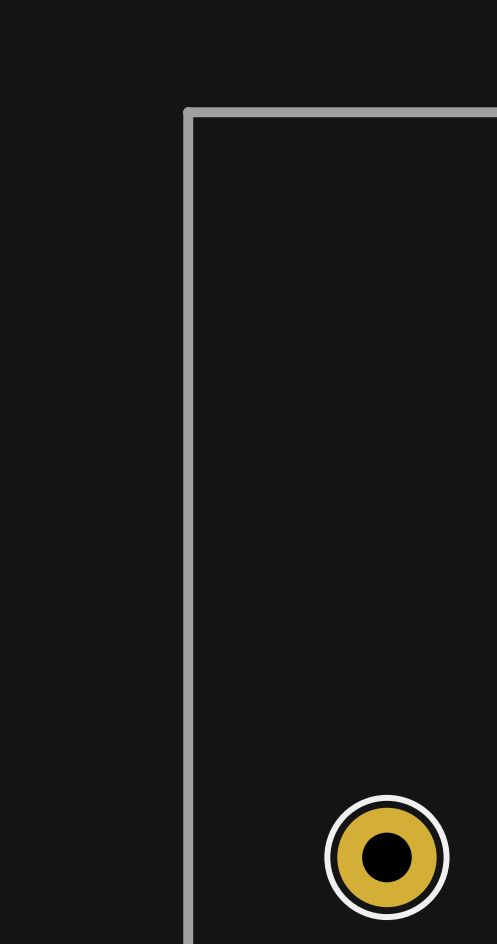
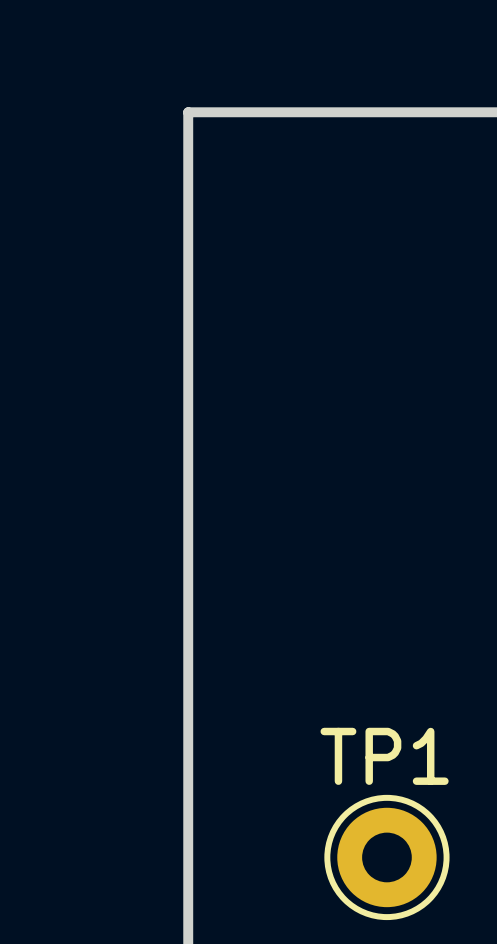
TP1 name: none -> TP1 (384, 756)

